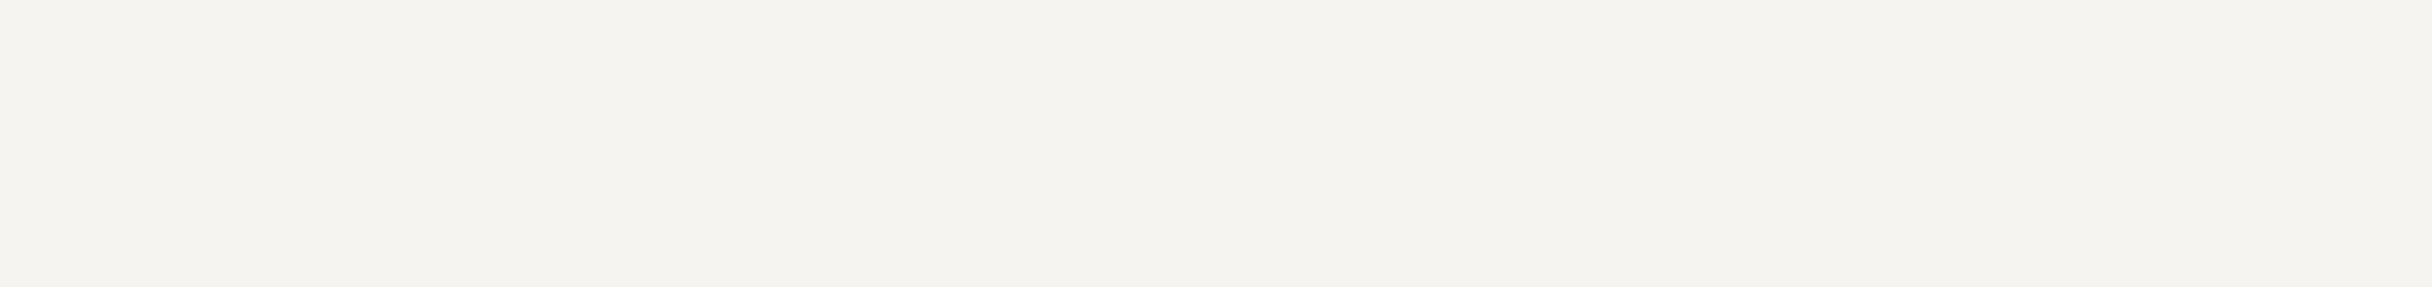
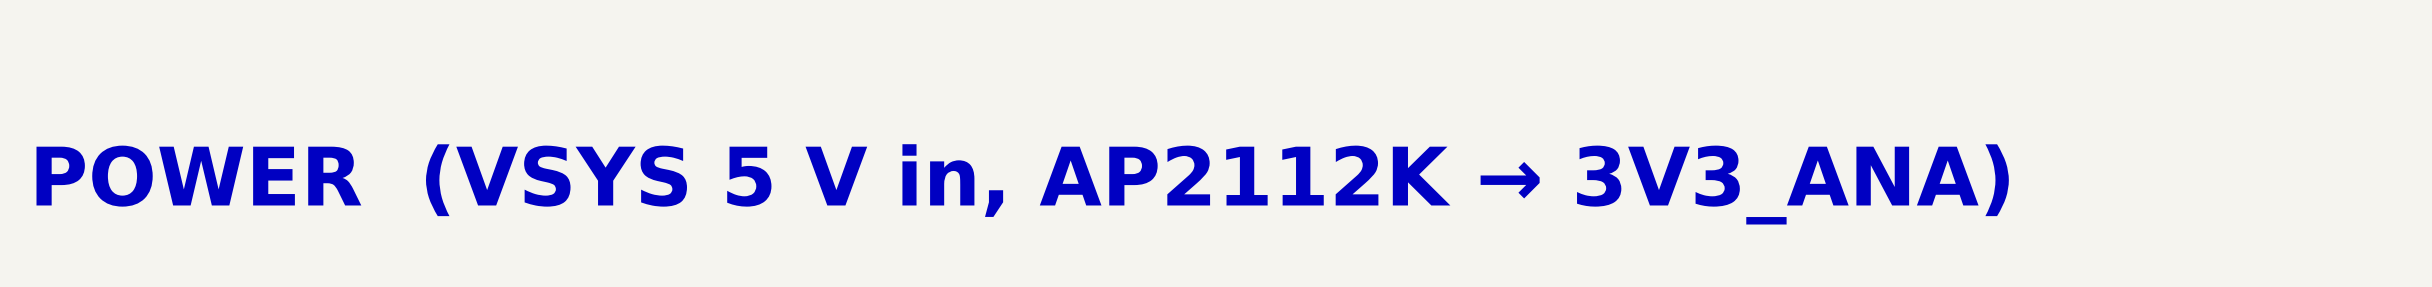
text: none -> POWER (VSYS 5 V in, AP2112K → 3V3_ANA) (1022, 184)

